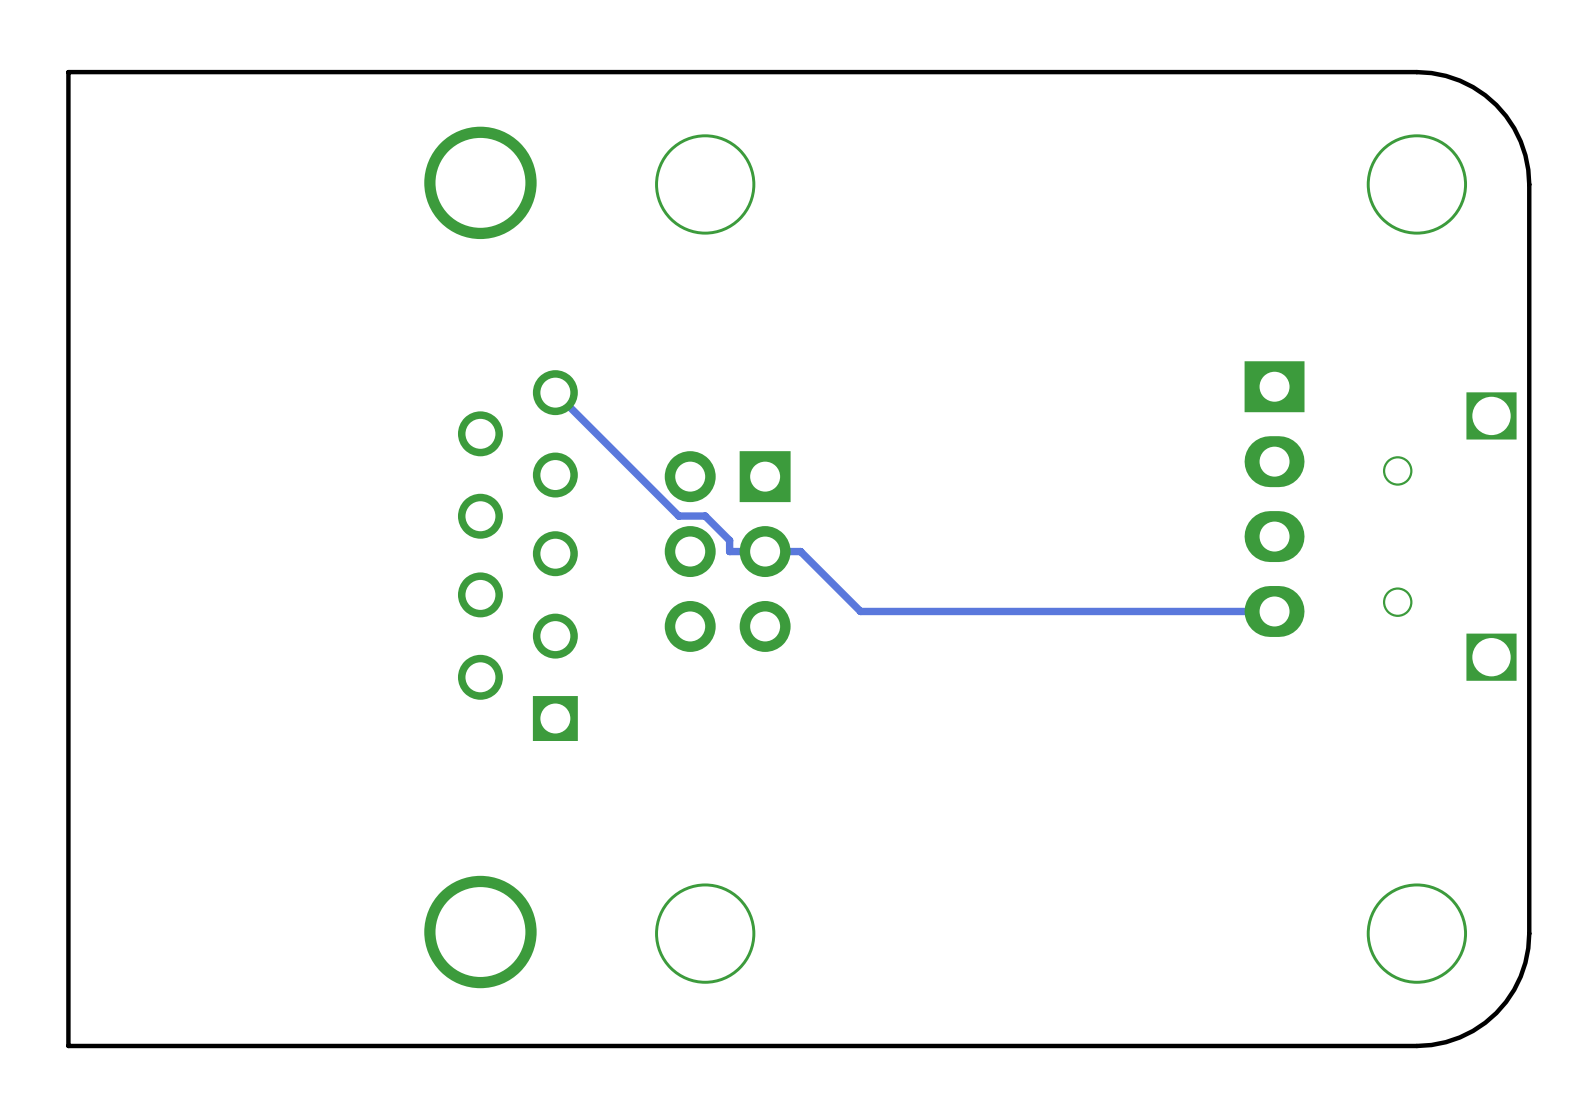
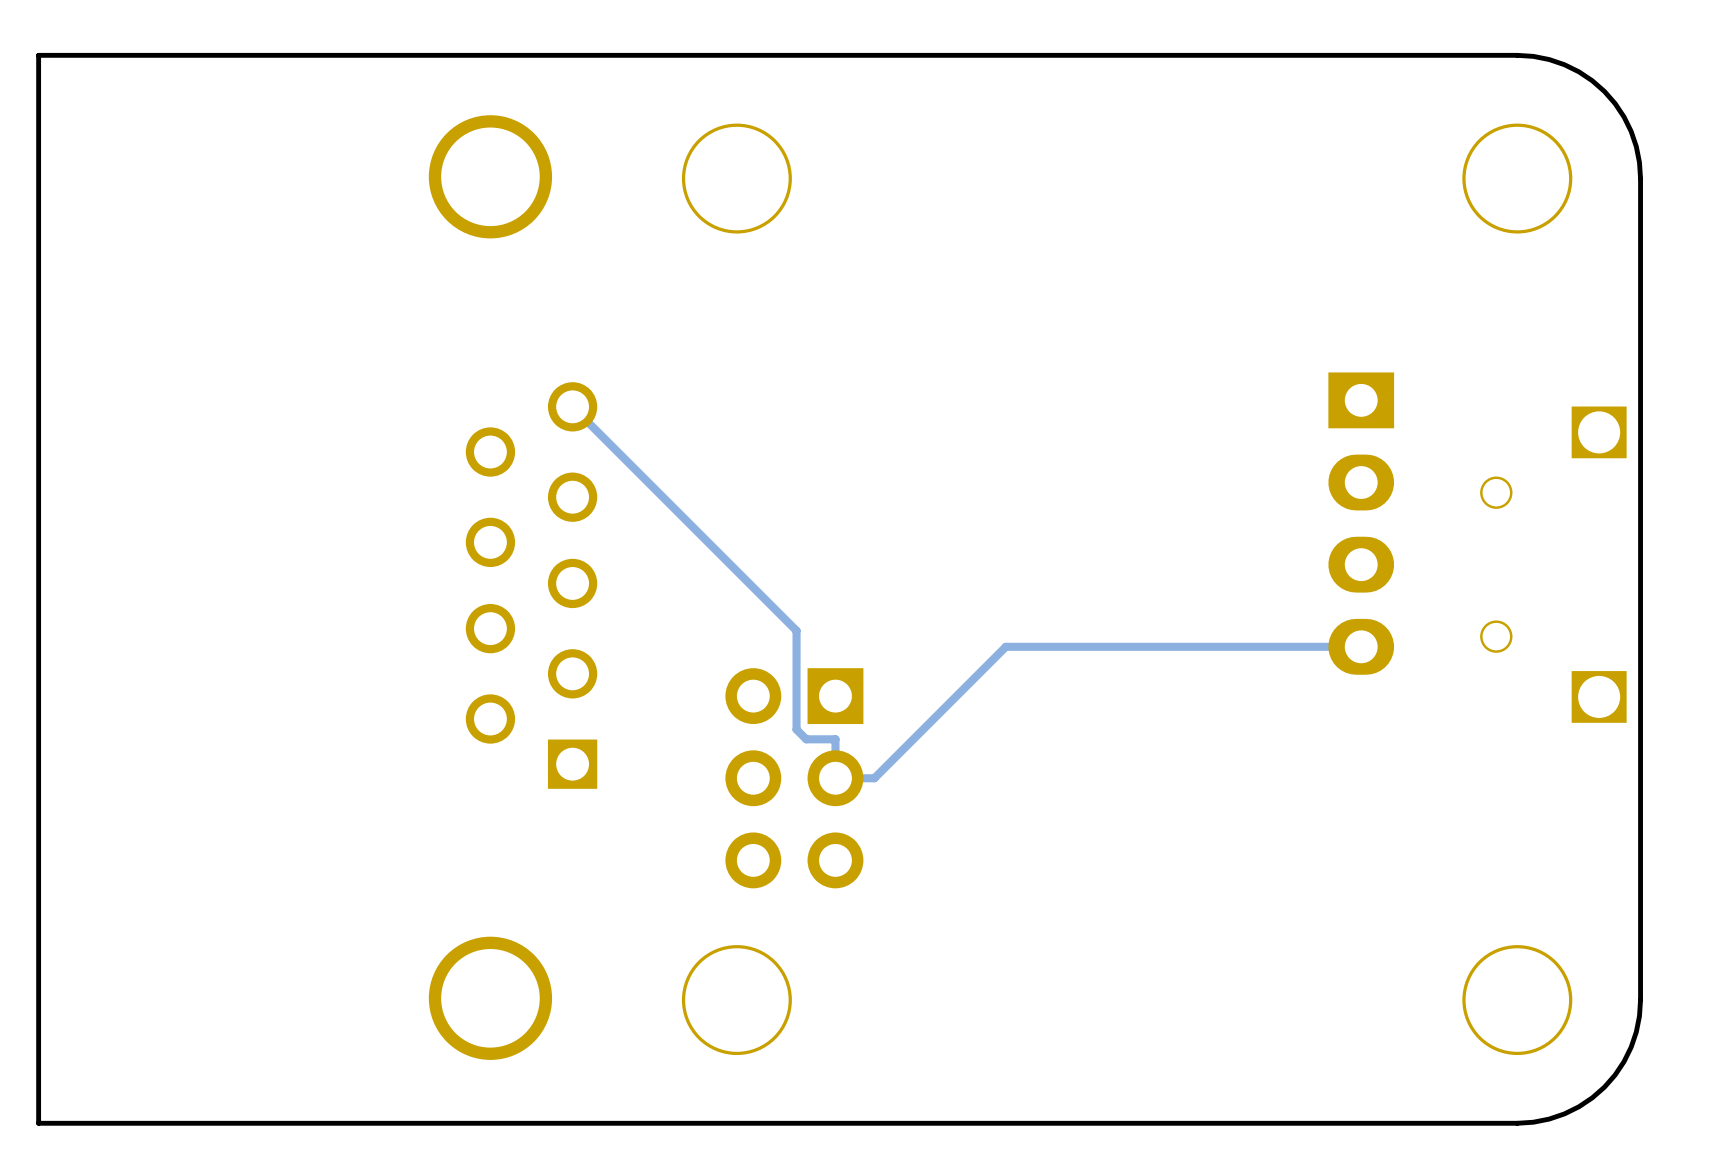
track: (678, 516) (705, 516) (729, 540) (729, 551) (800, 551) (860, 611) (950, 611) -> (707, 542) (796, 630) (796, 729) (806, 739) (835, 739) (835, 778) (874, 778) (1005, 646)
part position: (727, 551) -> (794, 778)

